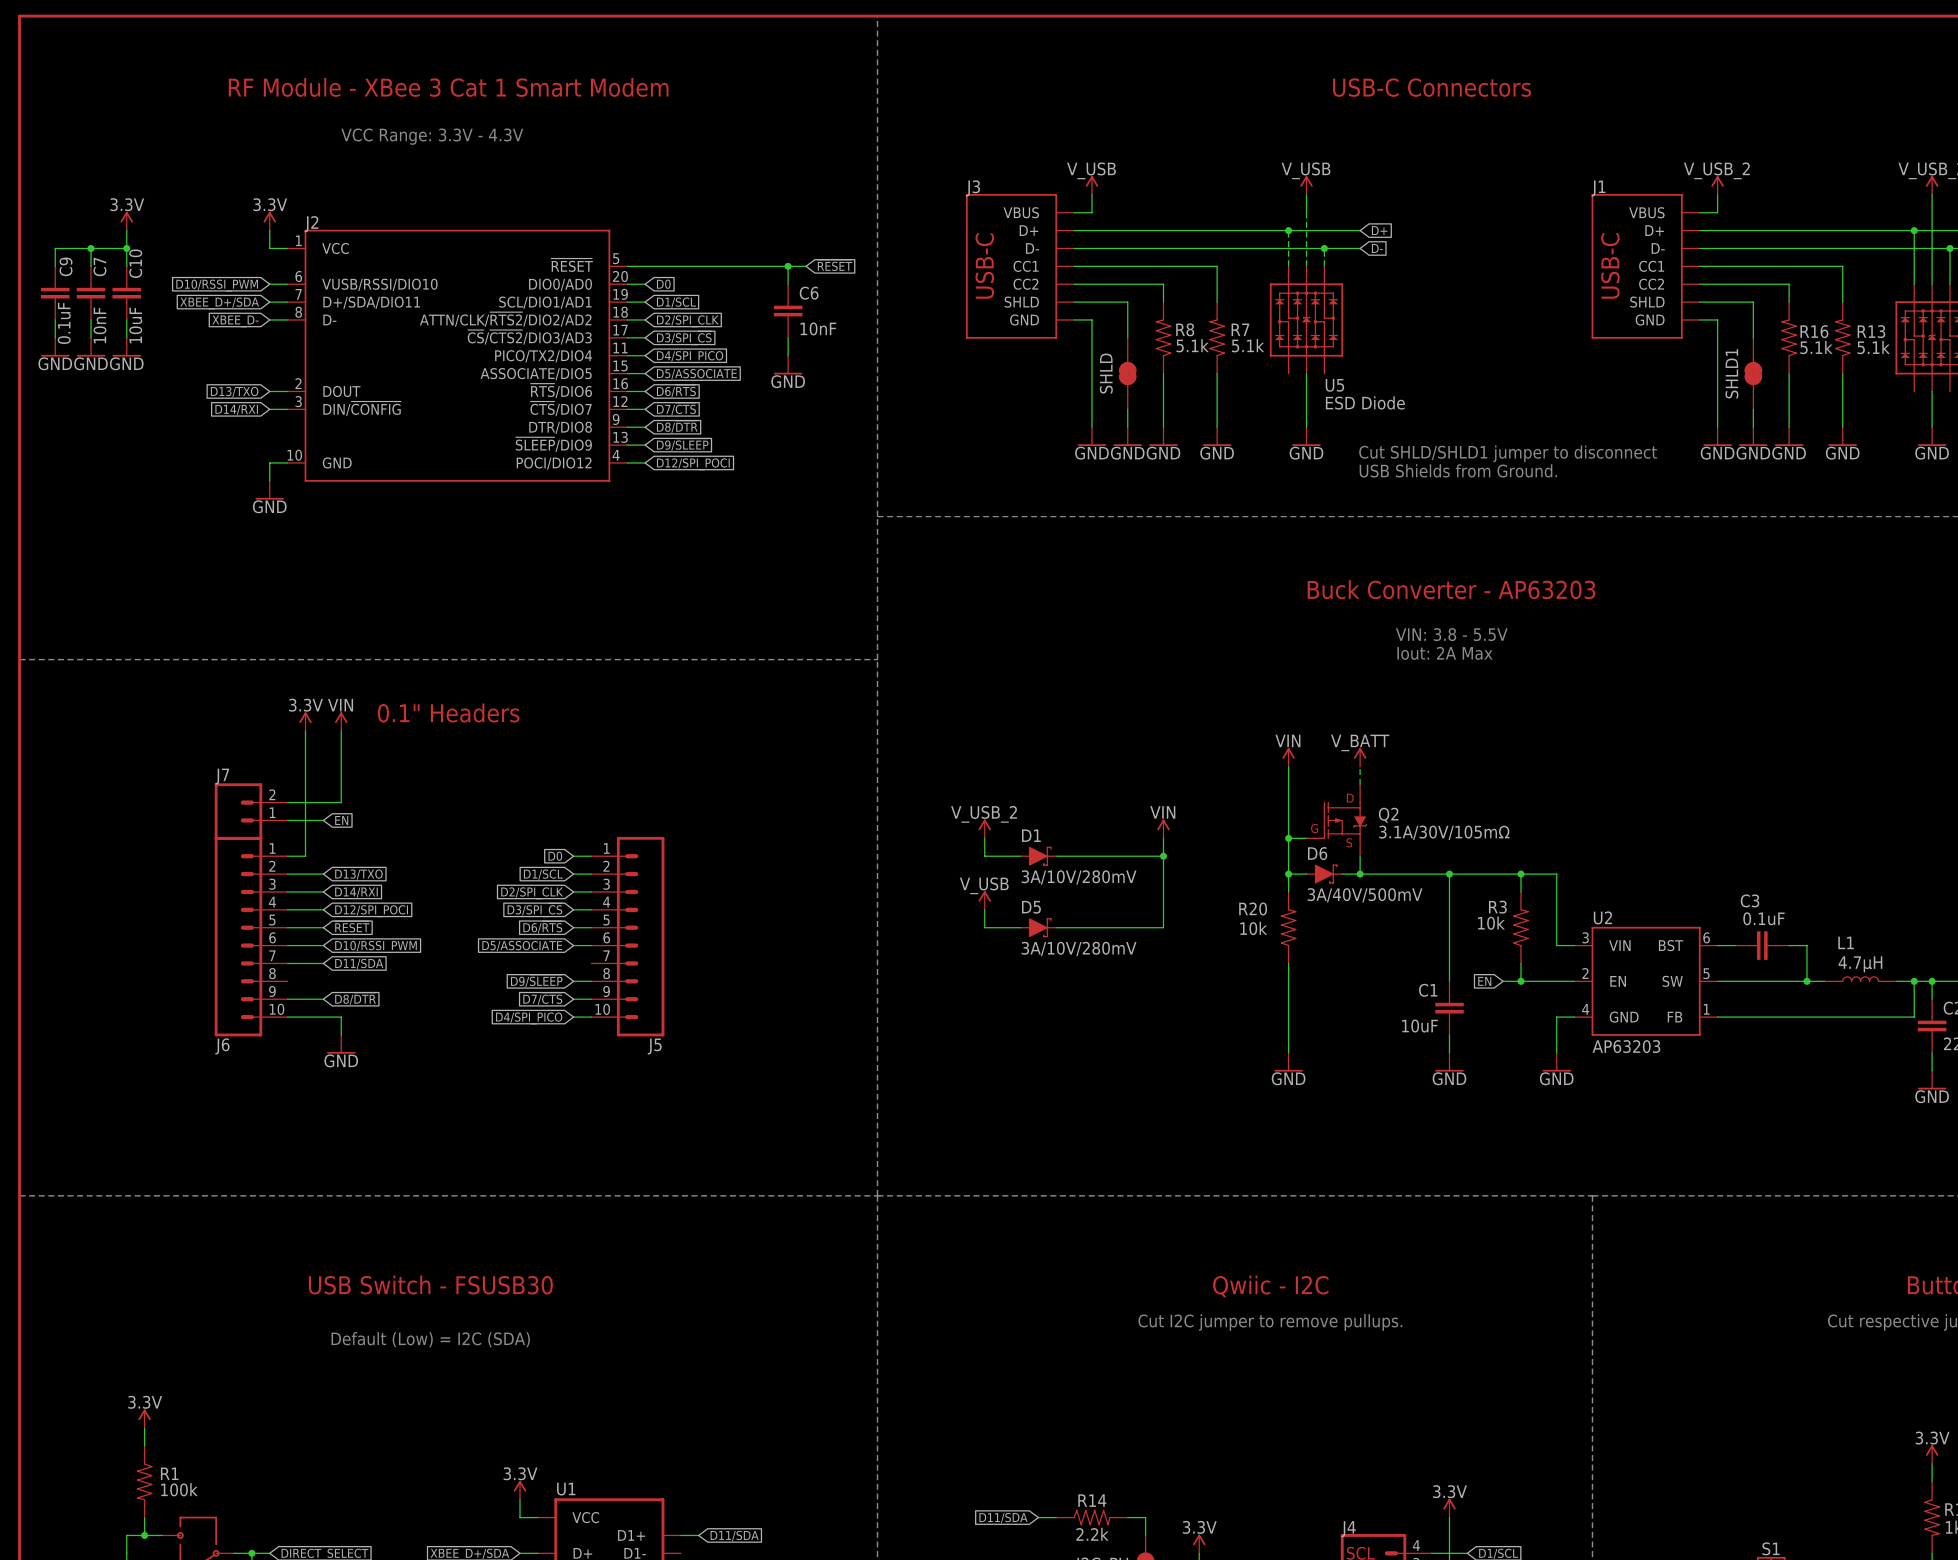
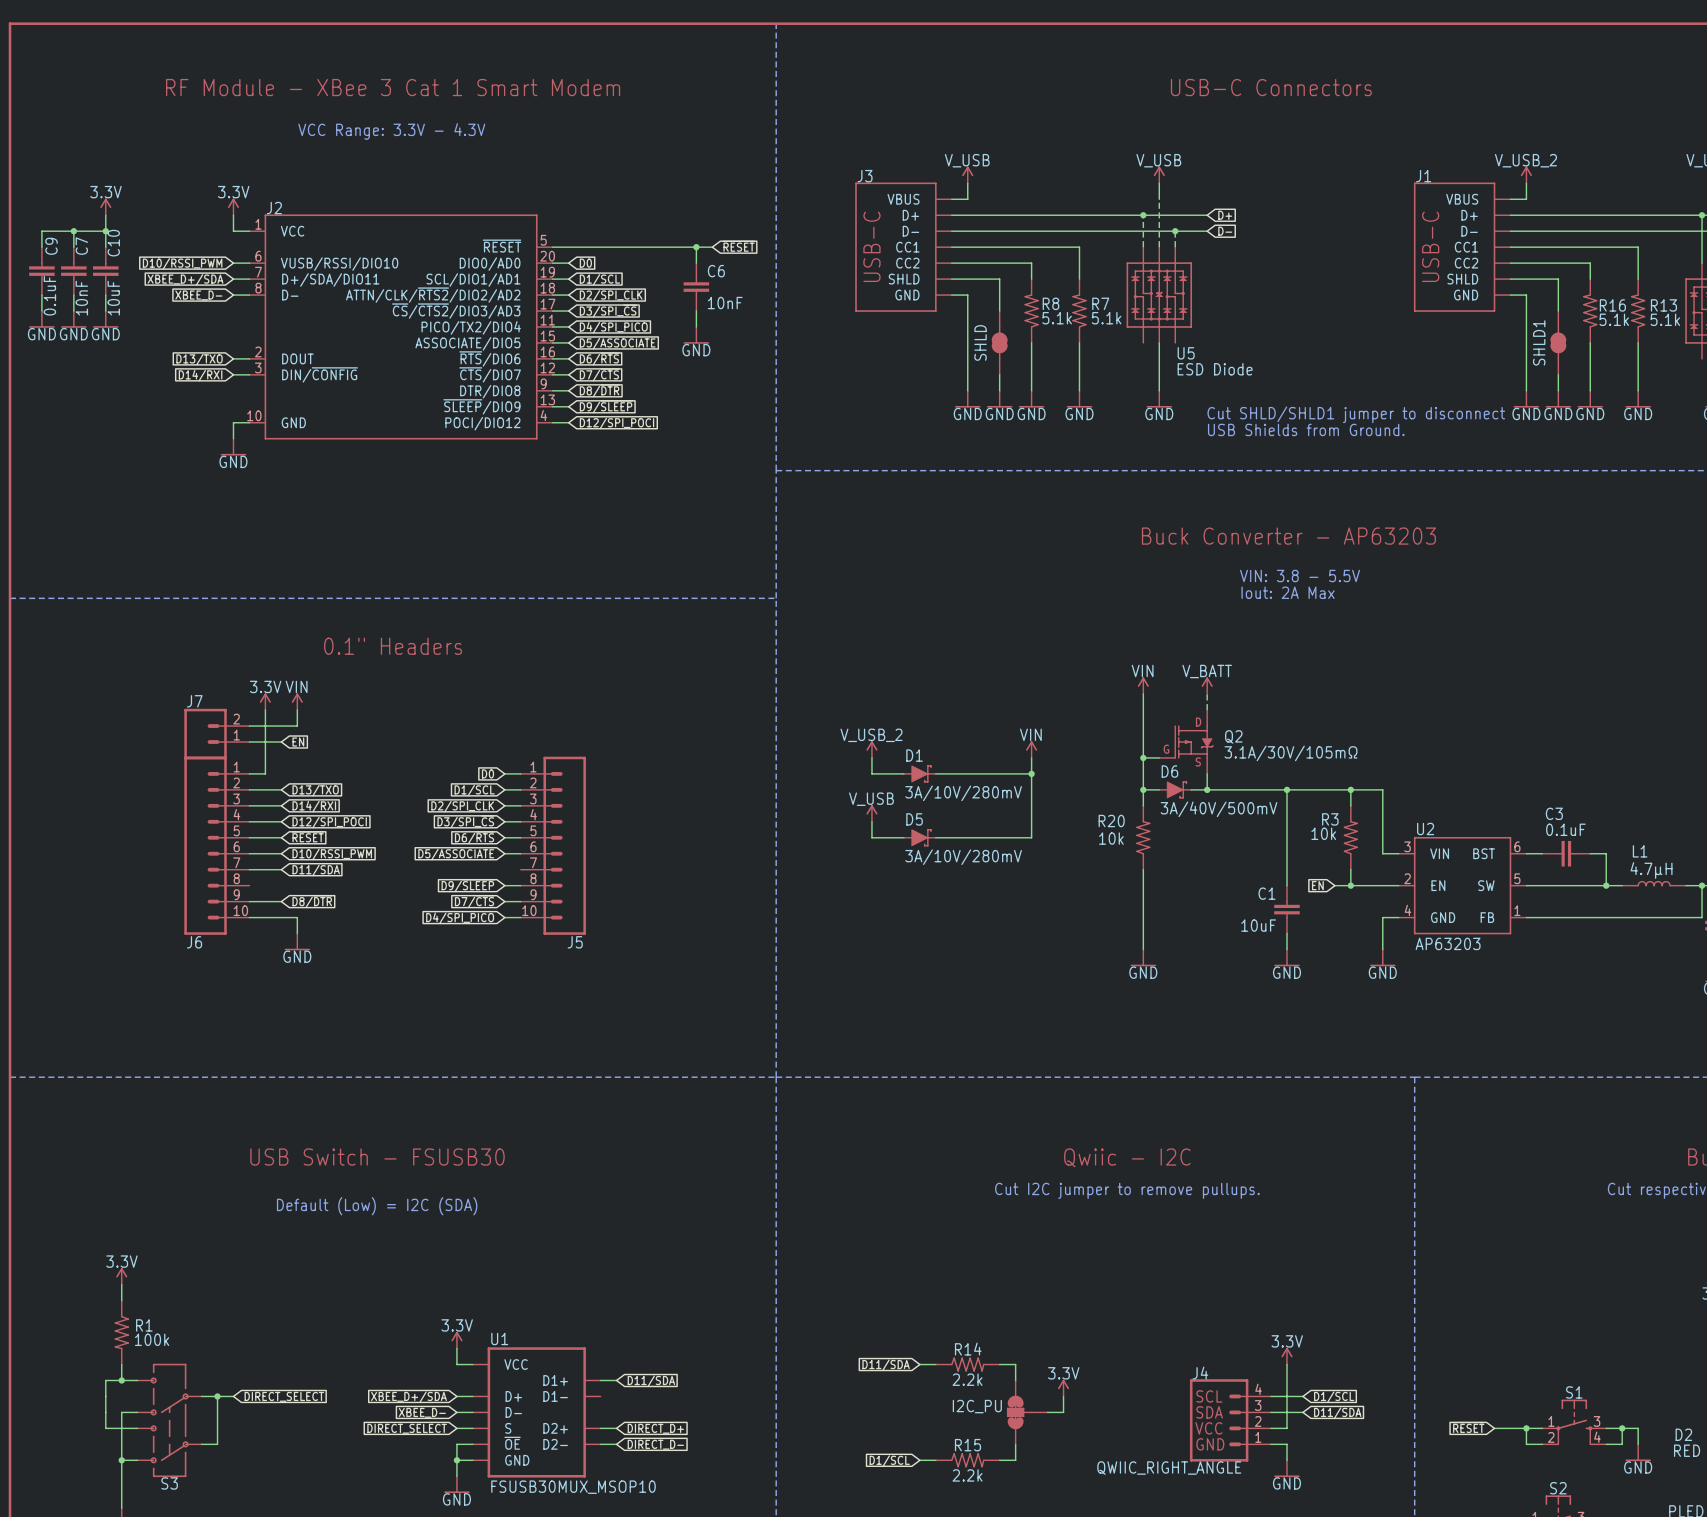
power symbol position: 3.3V (305, 721) -> 3.3V (265, 701)
power symbol position: VIN (341, 721) -> VIN (297, 701)
wire: (305, 731) (305, 784) -> none
wire: (341, 731) (341, 784) -> none

